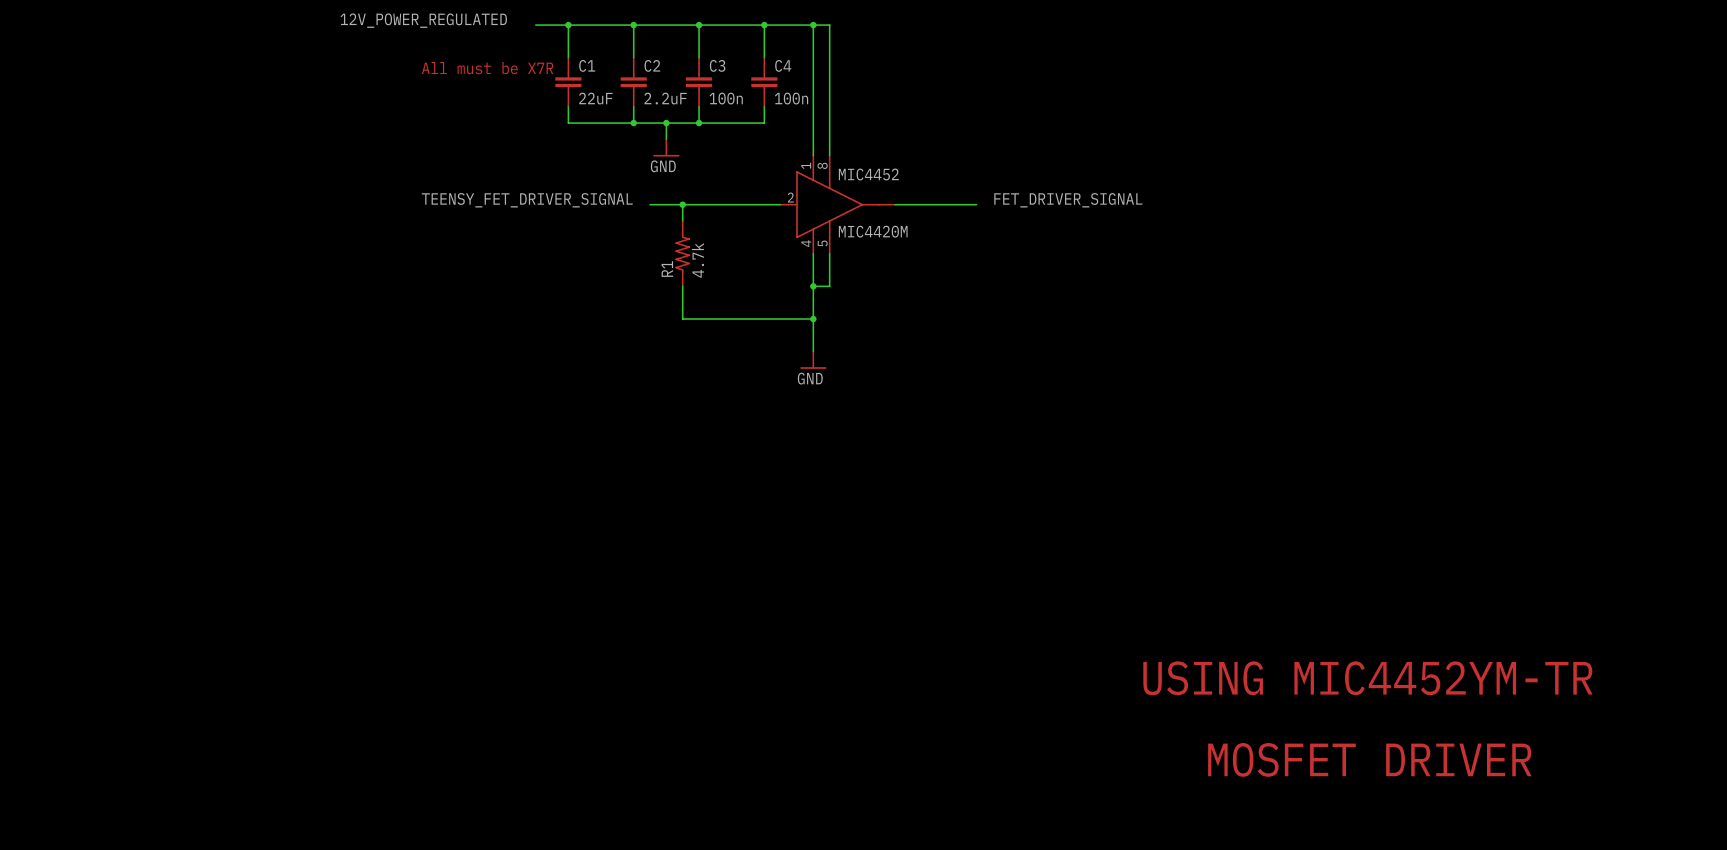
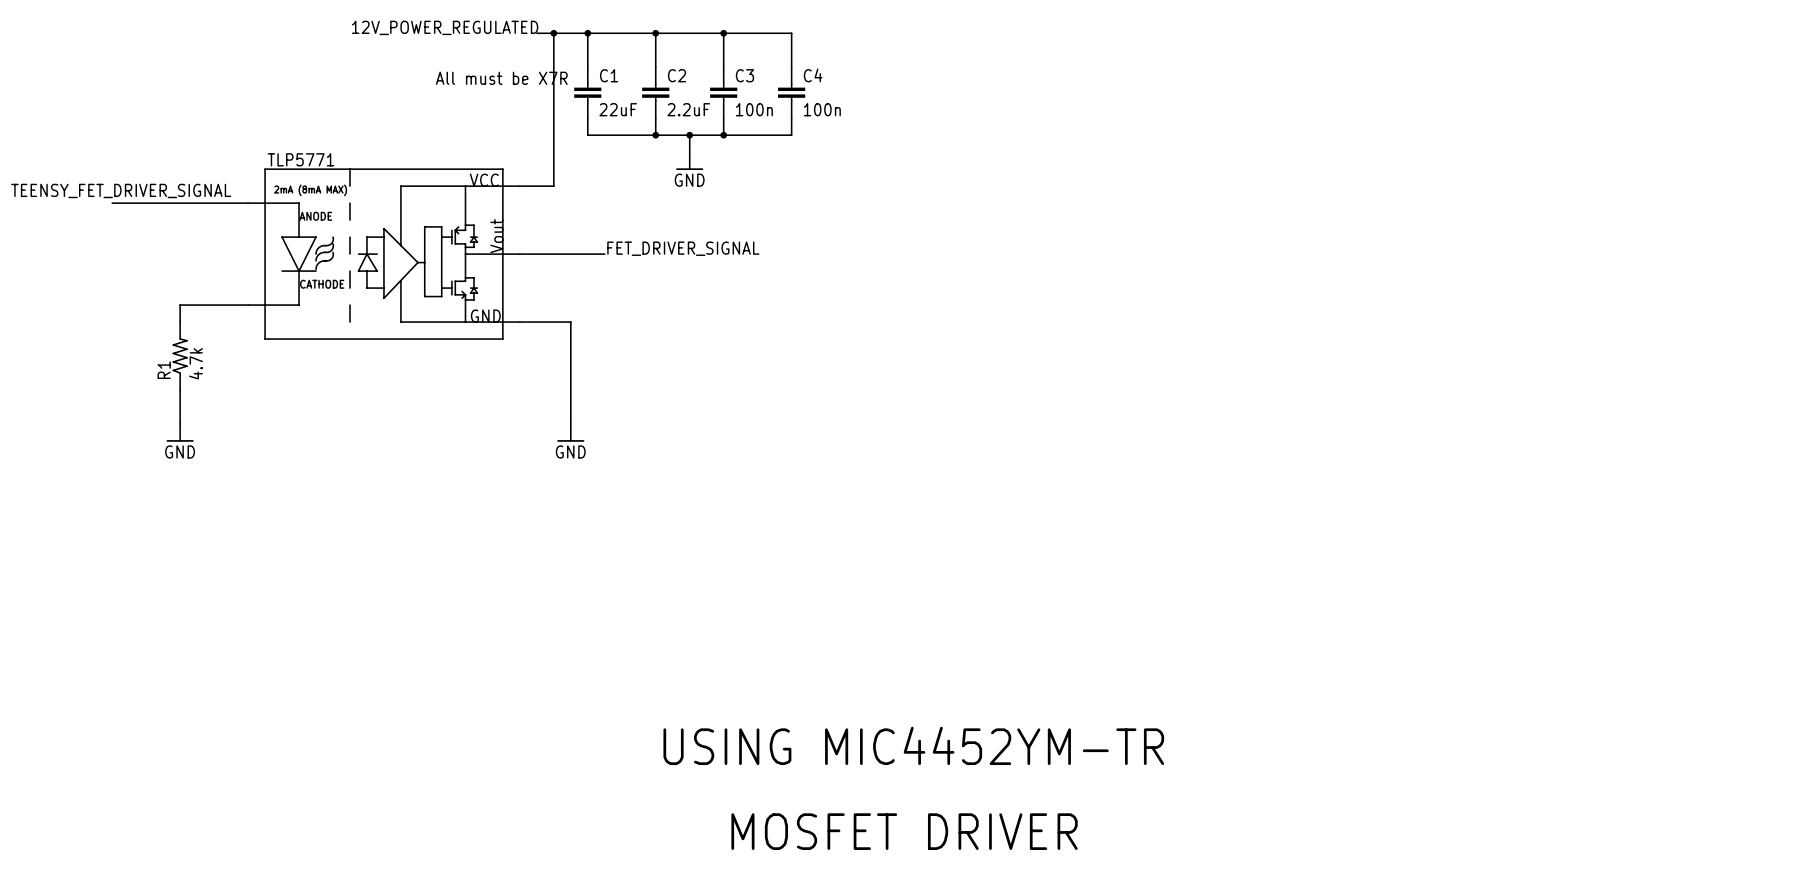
wire: none -> (536, 33) (553, 33) (553, 186) (519, 186)
junction: none -> (553, 33)
wire: (764, 25) (829, 25) (829, 155) -> none
junction: (764, 25) -> none
wire: (813, 25) (813, 155) -> none
junction: (813, 25) -> none
label: none -> TEENSY_FET_DRIVER_SIGNAL (121, 190)
wire: none -> (112, 203) (248, 203)
label: TEENSY_FET_DRIVER_SIGNAL (527, 200) -> none
label: FET_DRIVER_SIGNAL (1068, 200) -> none
wire: (650, 204) (780, 204) -> none
wire: (682, 204) (682, 221) -> none
junction: (682, 204) -> none
MIC4452: MIC4420M (837, 204) -> none
wire: (894, 204) (976, 204) -> none
label: none -> FET_DRIVER_SIGNAL (683, 248)
part: none -> (383, 254)
wire: none -> (519, 254) (604, 254)
R1 position: (682, 253) -> (180, 356)
wire: (813, 253) (813, 351) -> none
wire: (829, 253) (829, 286) (813, 286) -> none
wire: none -> (248, 305) (180, 305) (180, 322)
wire: (682, 286) (682, 319) (813, 319) -> none
junction: (813, 286) -> none
wire: none -> (519, 322) (570, 322) (570, 423)
junction: (813, 319) -> none
power symbol: GND (813, 360) -> none
wire: none -> (180, 389) (180, 423)
power symbol: none -> GND (180, 432)
power symbol: none -> GND (570, 432)
text: USING MIC4452YM-TR (1367, 678) -> none
text: none -> USING MIC4452YM-TR (913, 745)
text: MOSFET DRIVER (1369, 759) -> none
text: none -> MOSFET DRIVER (904, 831)

